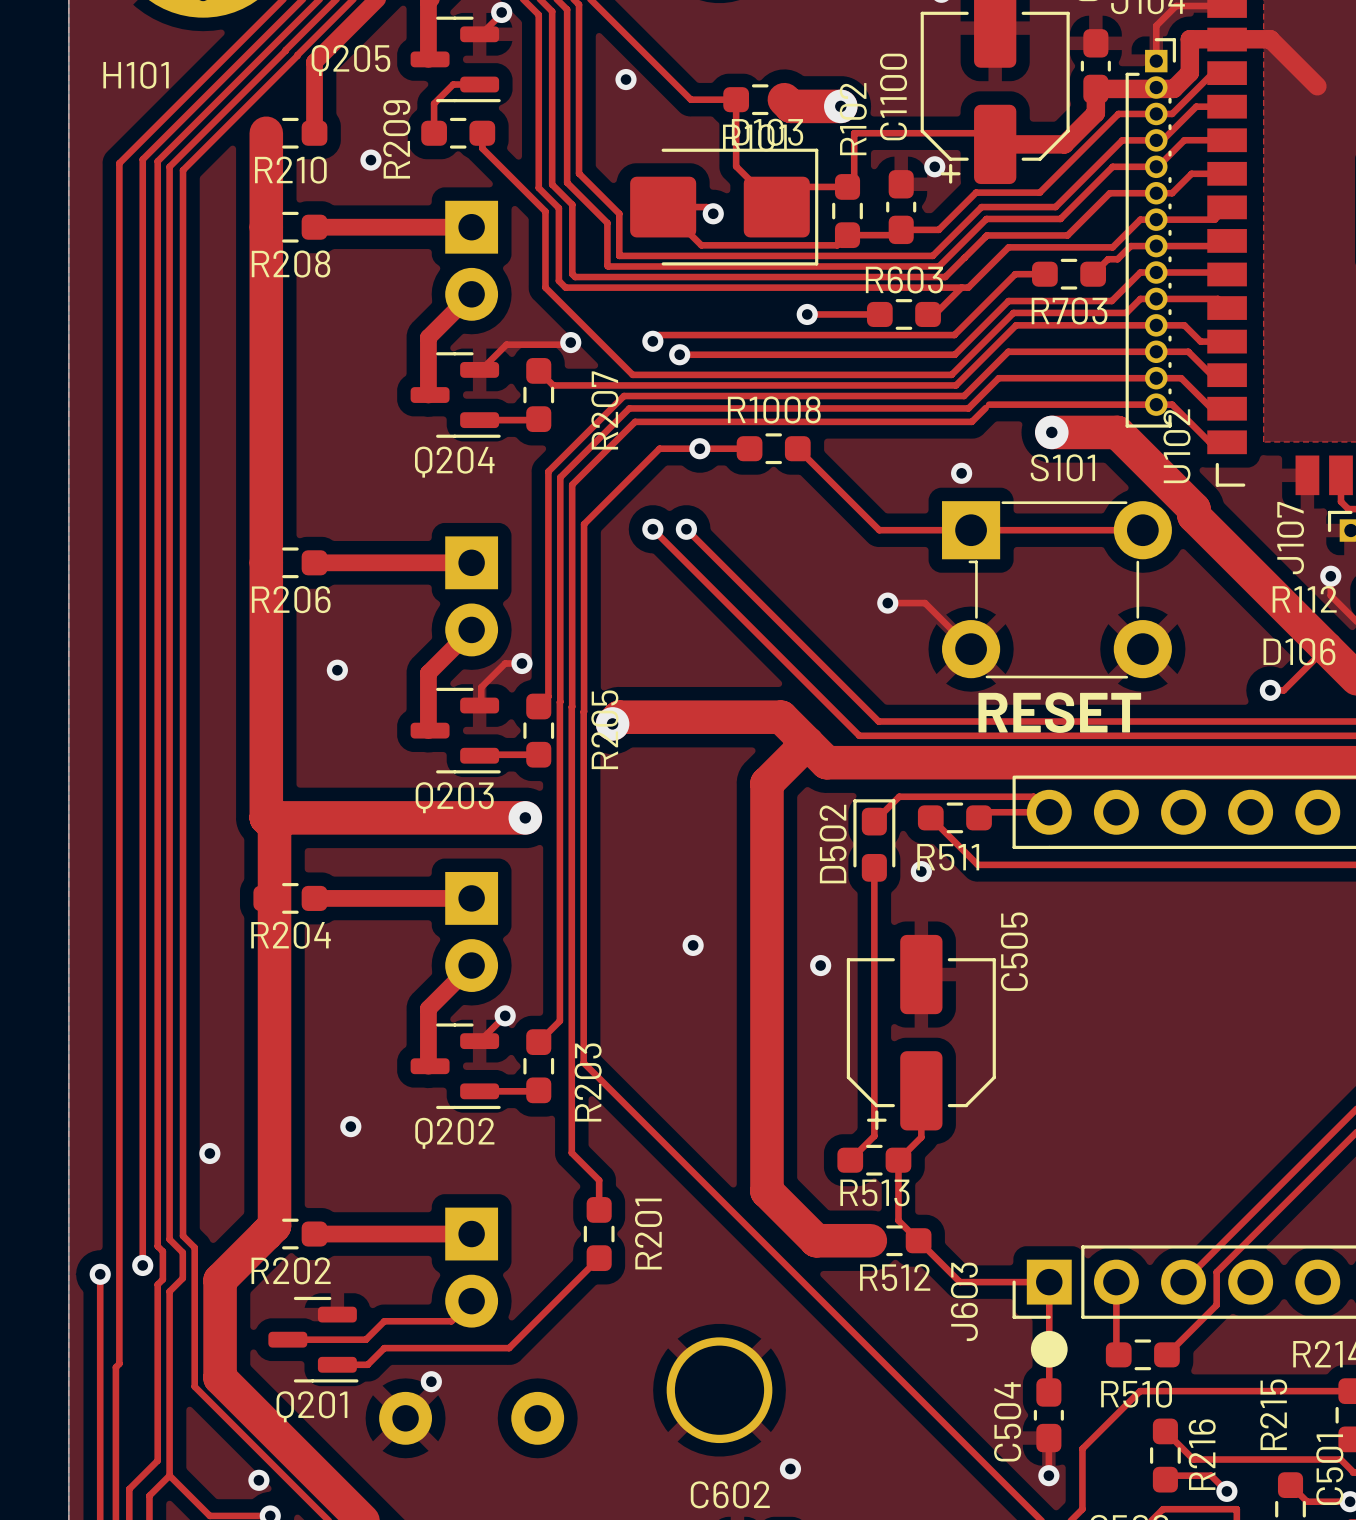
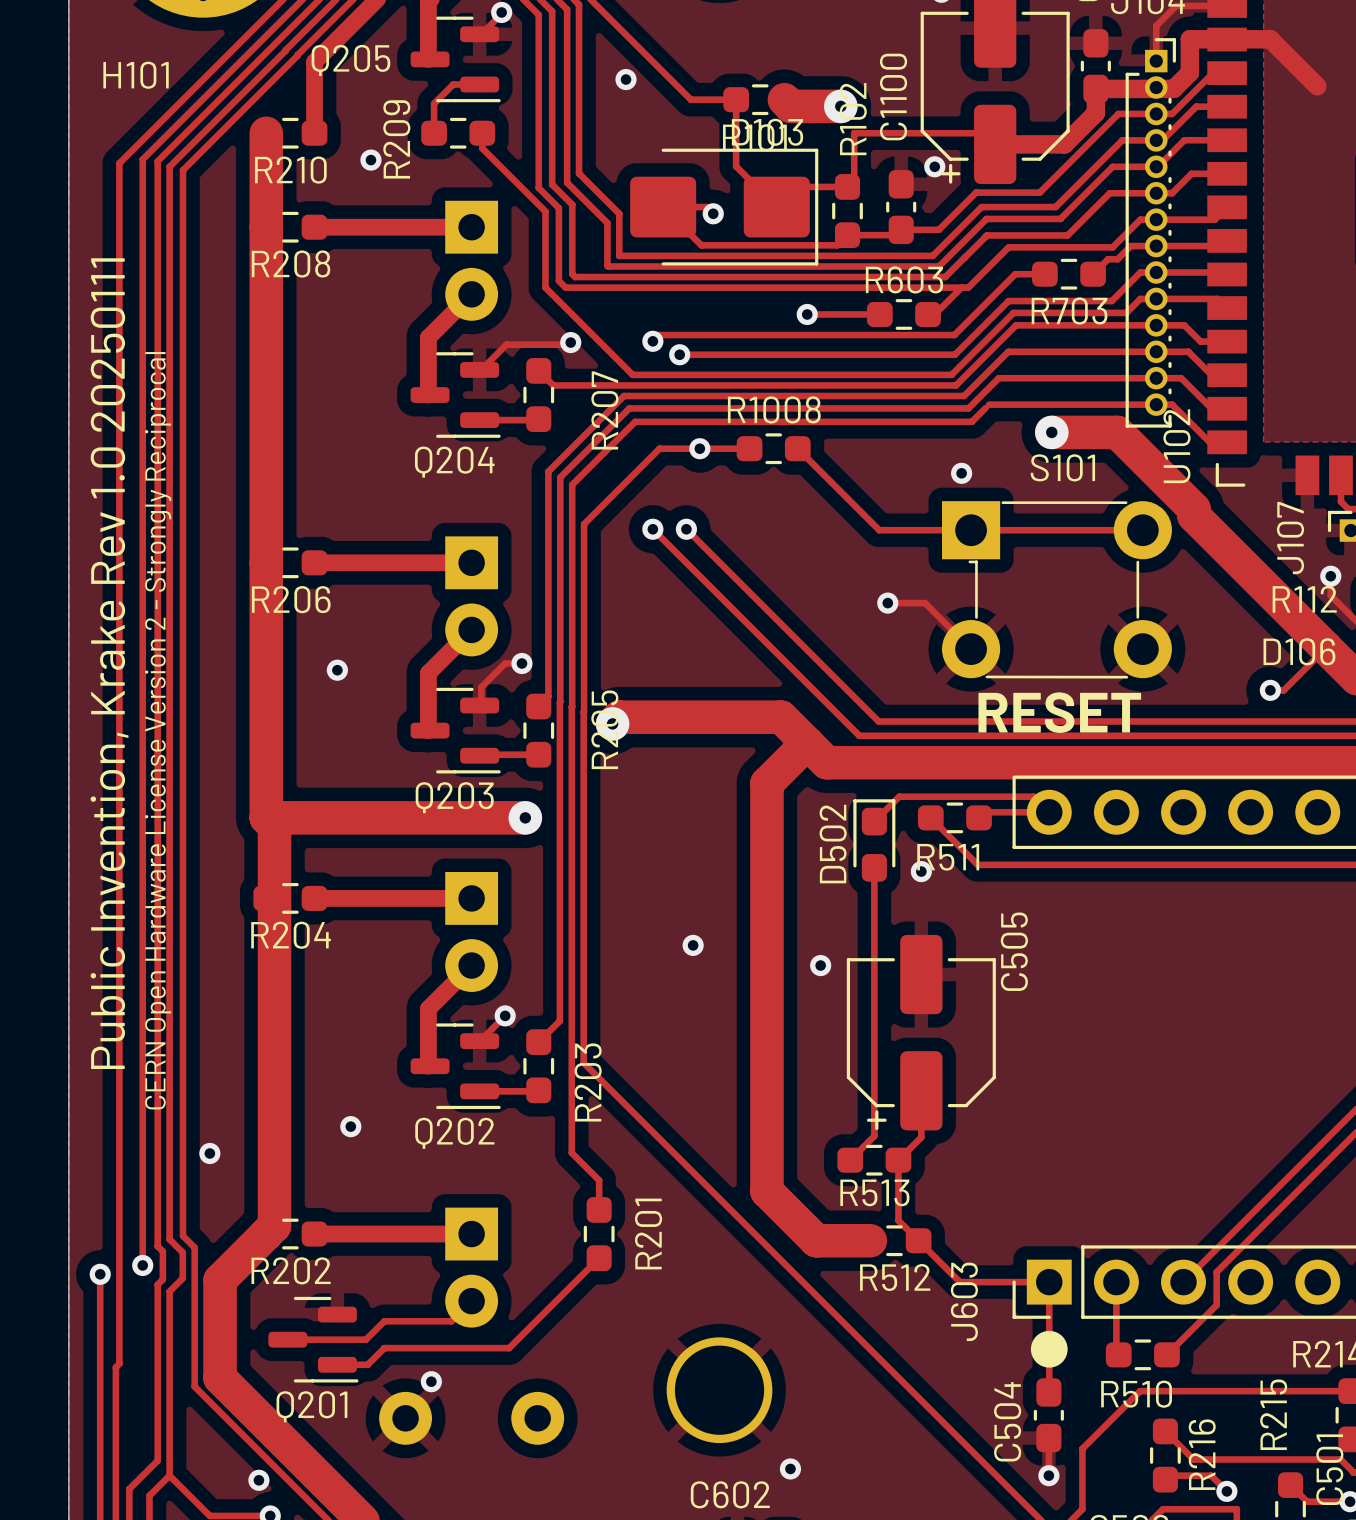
text: none -> Public Invention, Krake Rev 1.0 20250111 (109, 663)
text: none -> CERN Open Hardware License Version 2 - Strongly Reciprocal (158, 730)

